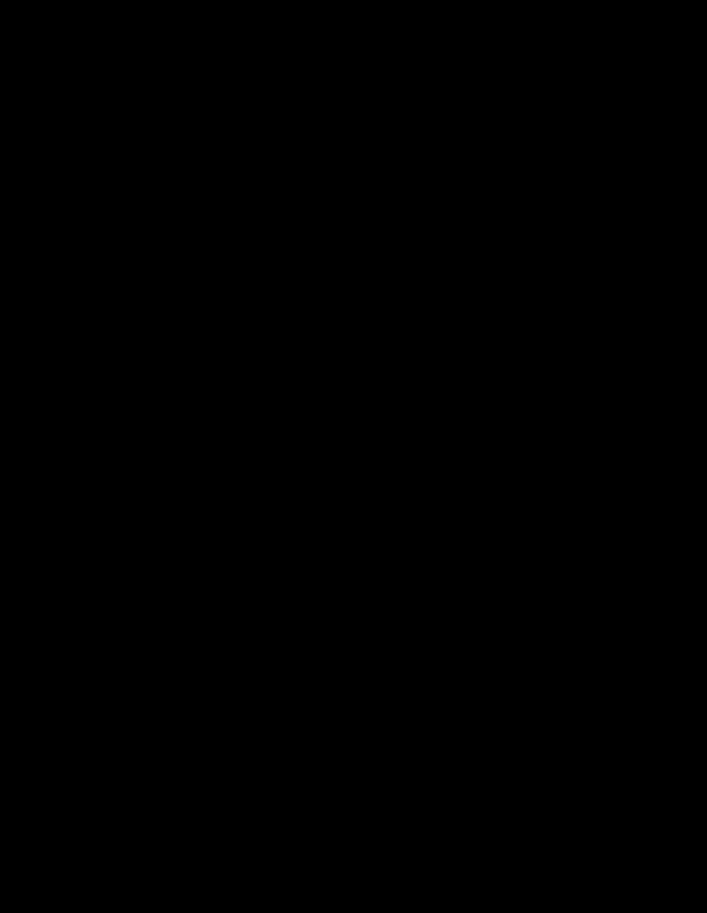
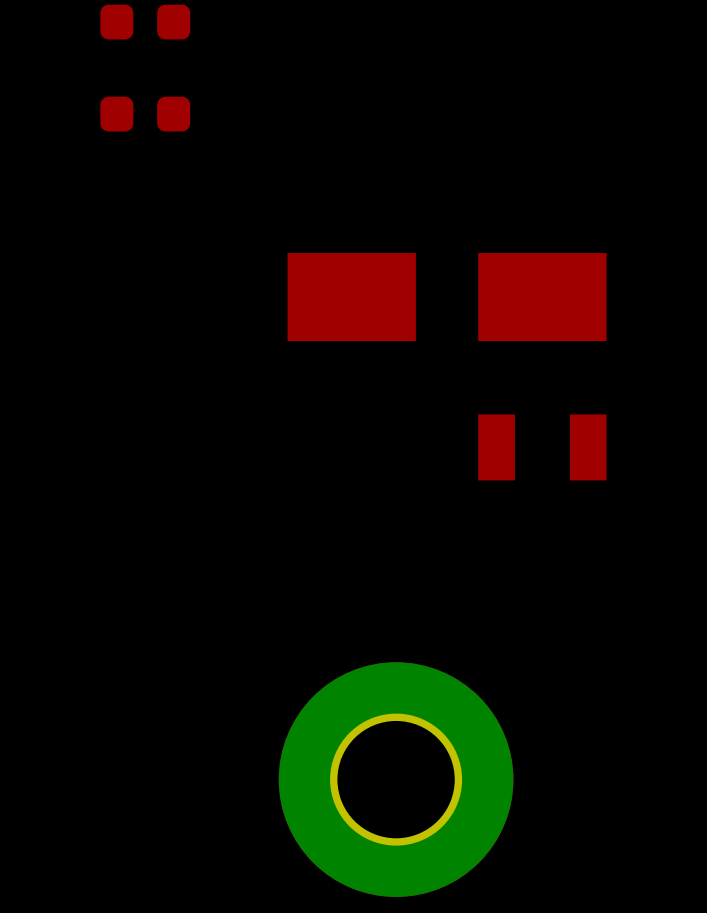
part: none -> (145, 22)
part: none -> (145, 114)
part: none -> (447, 297)
part: none -> (542, 447)
part: none -> (396, 779)

